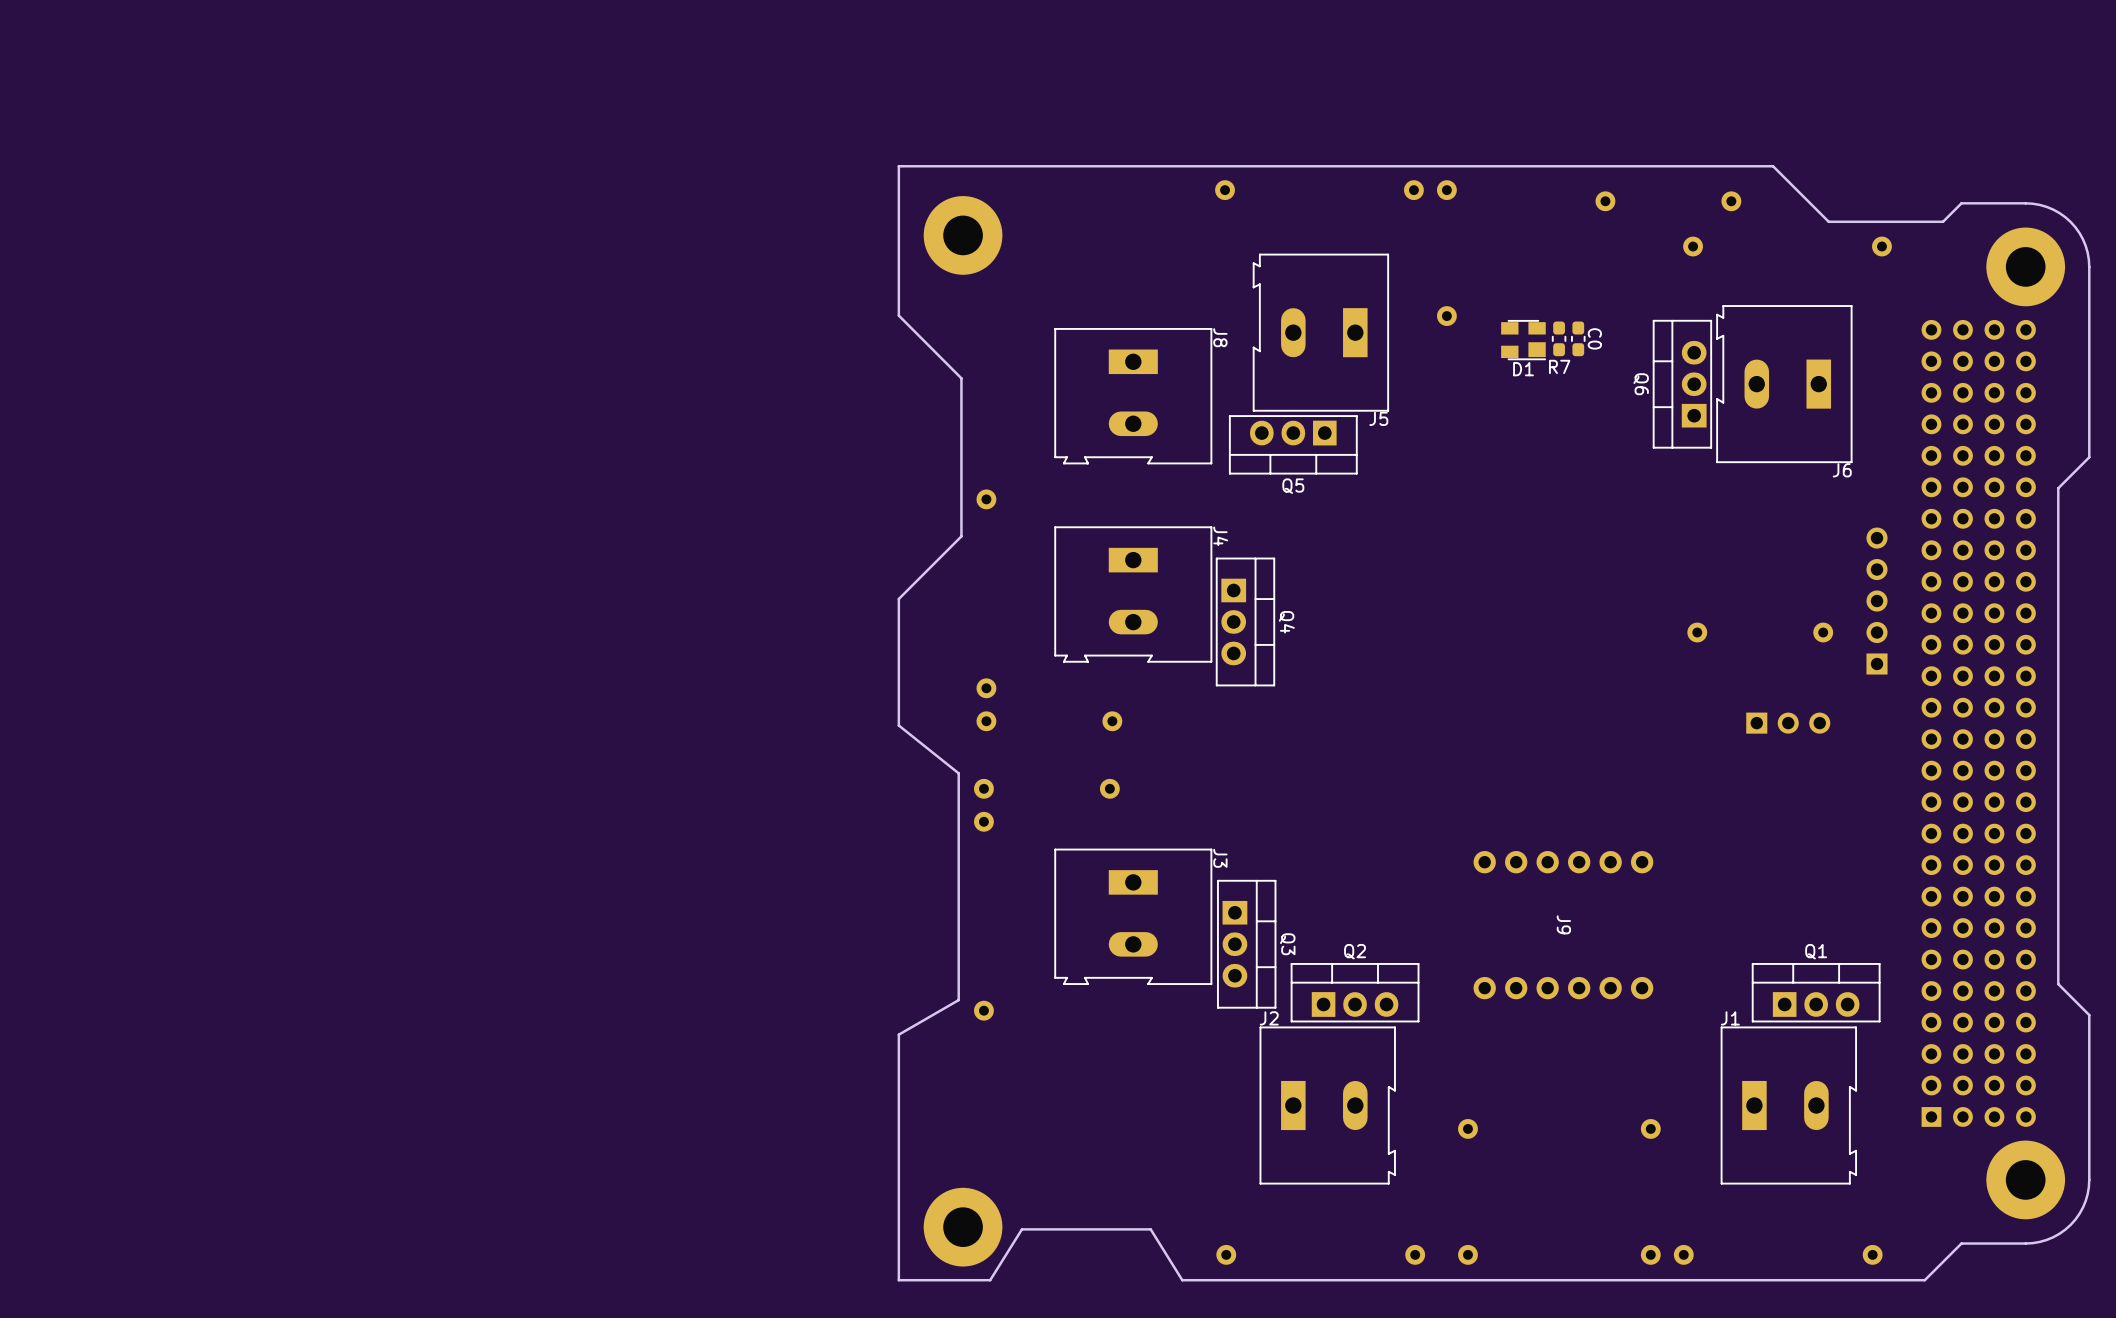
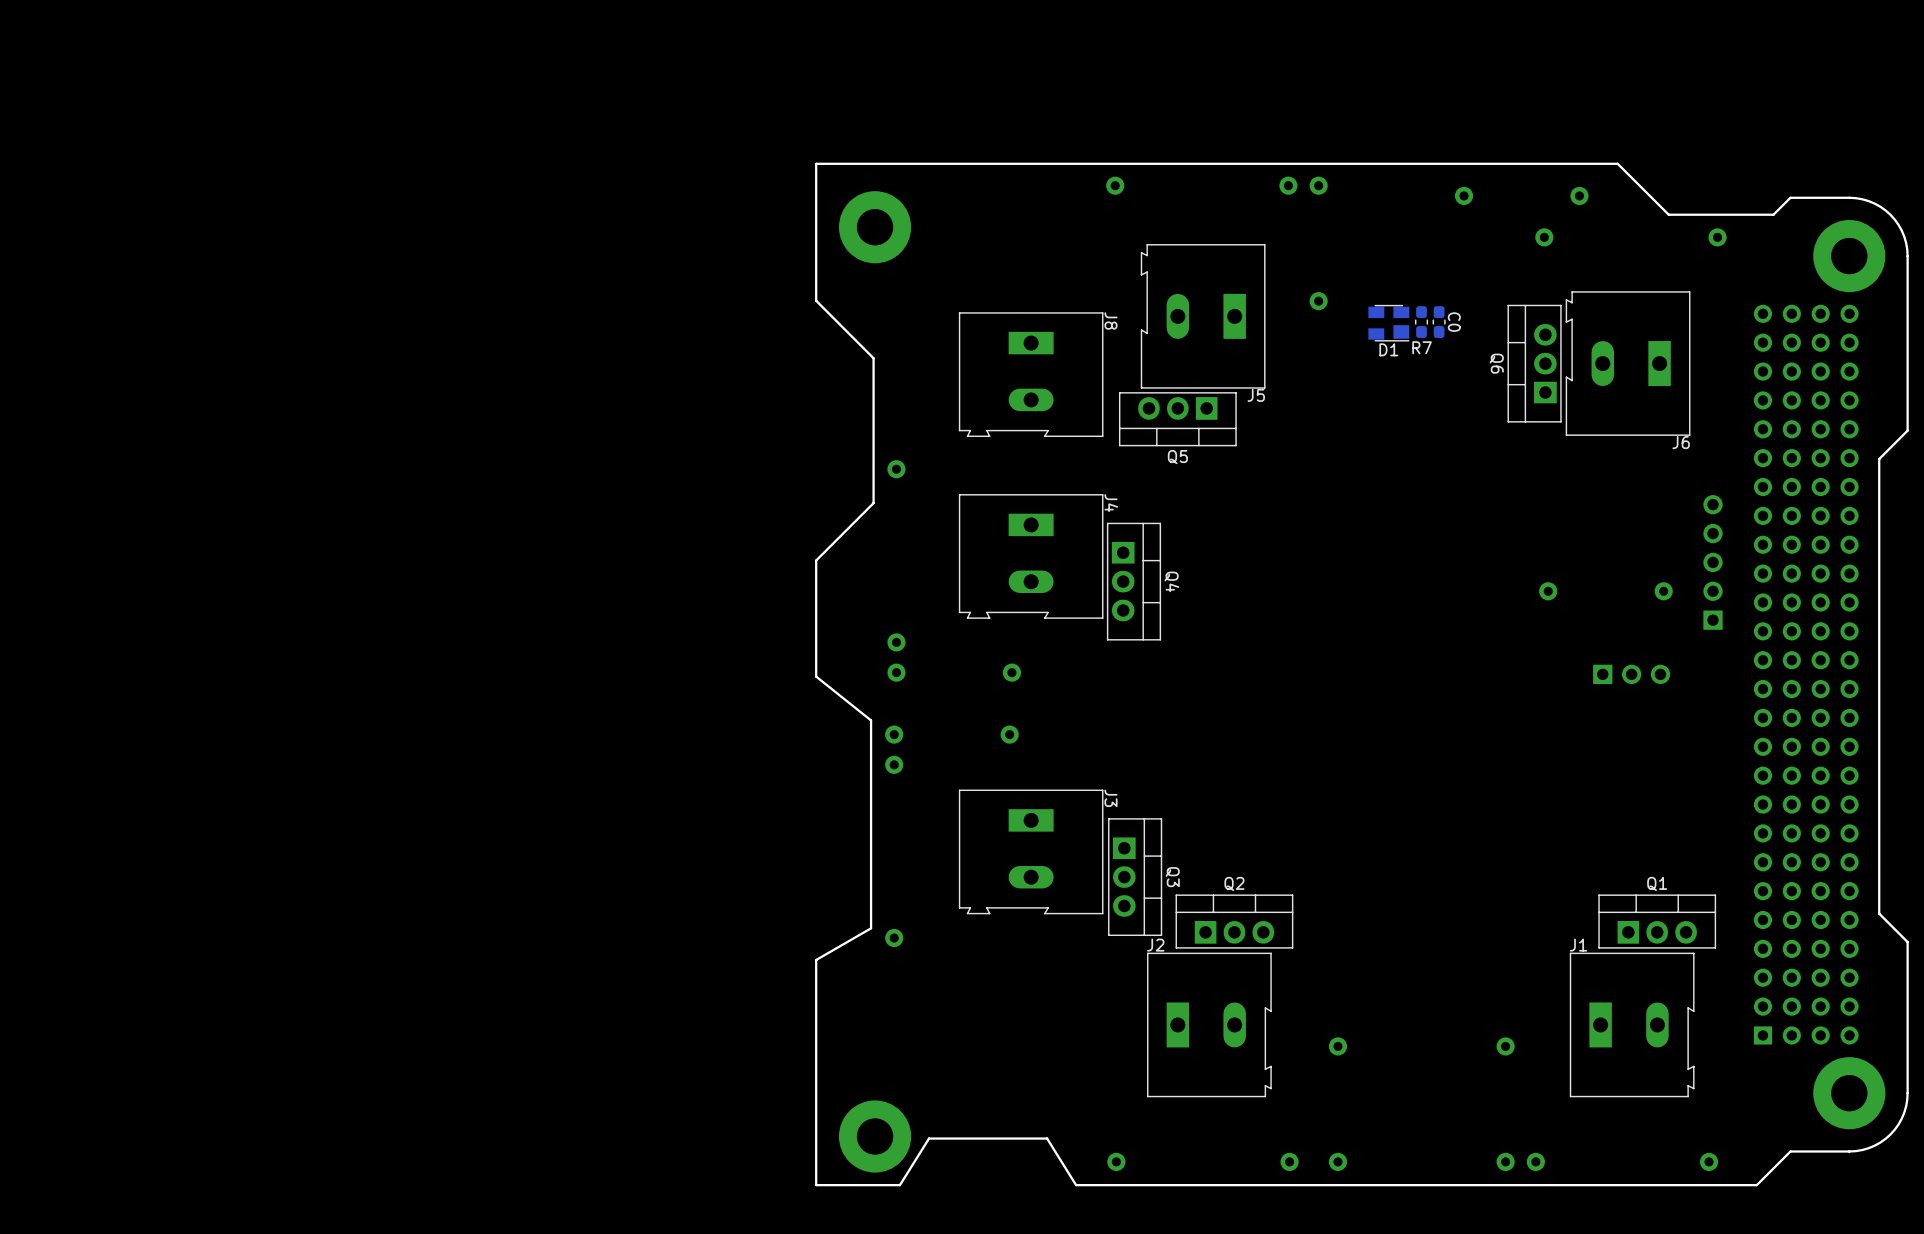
J9: (1563, 925) -> none

